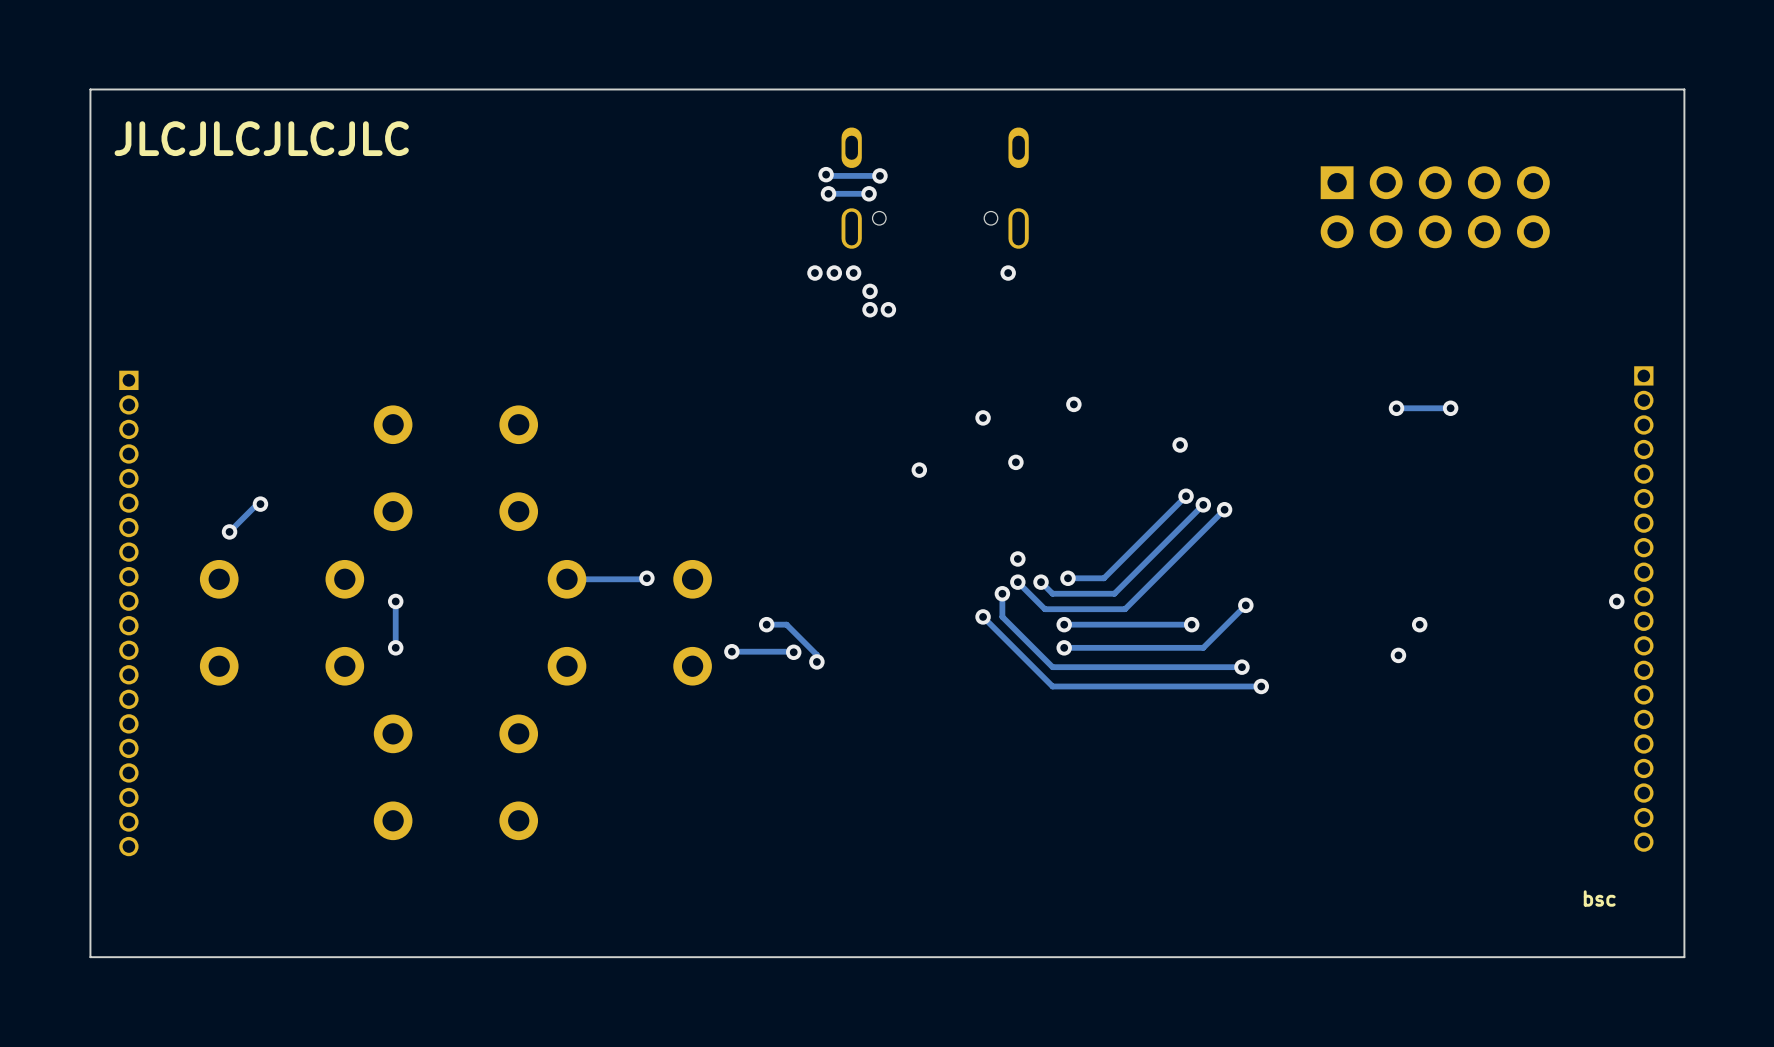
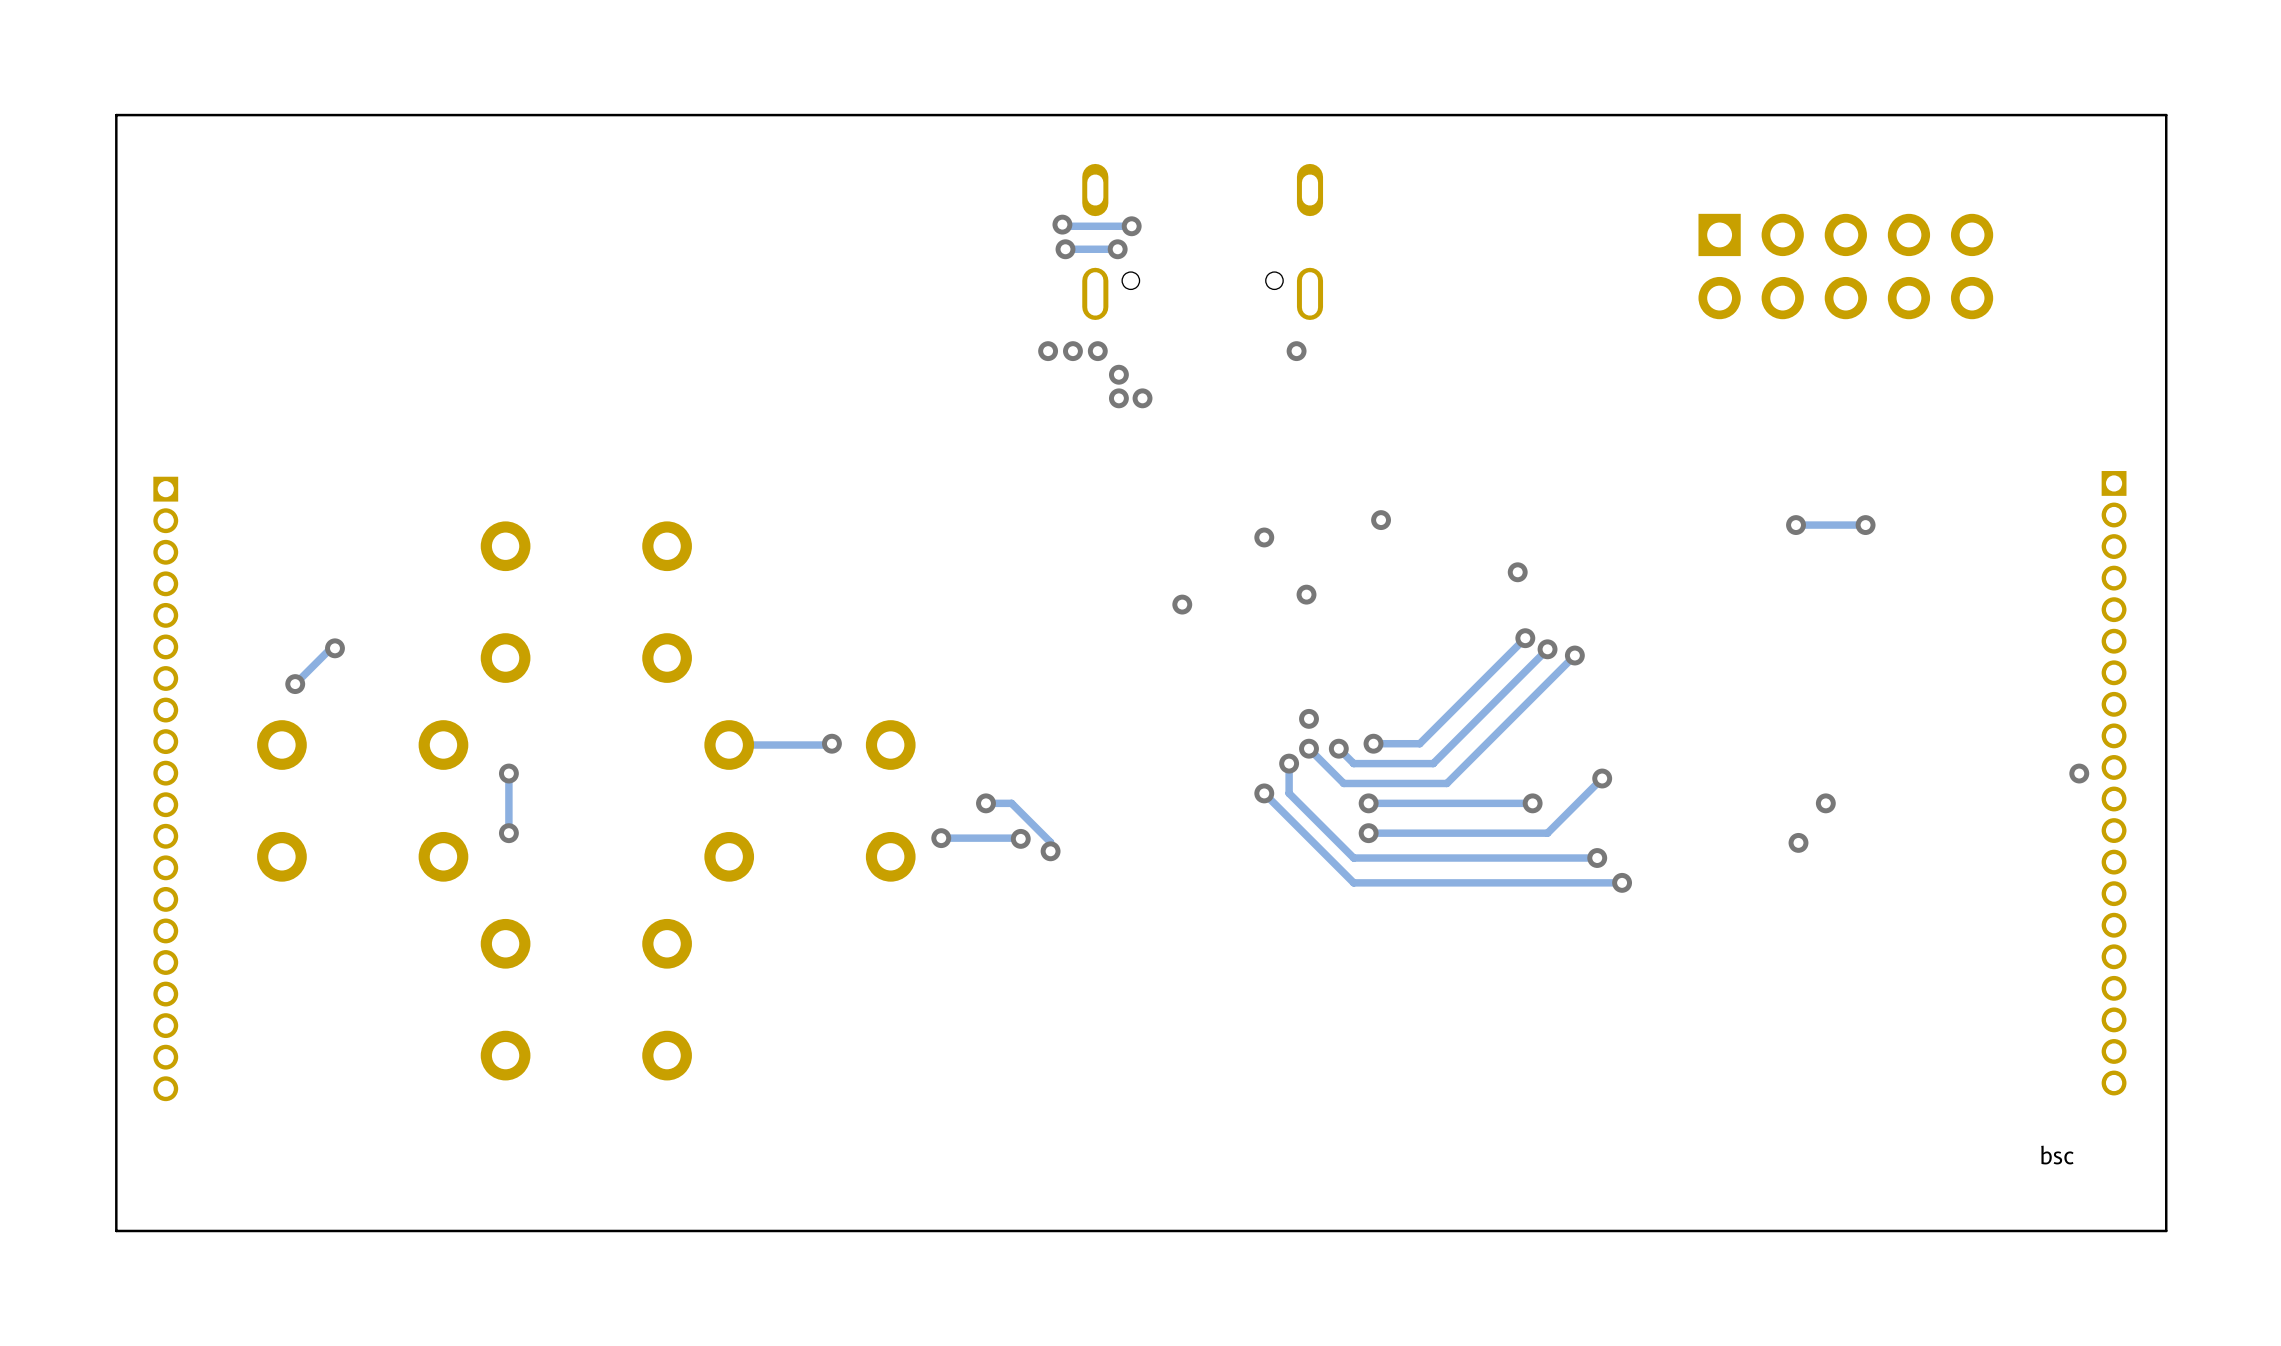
text: JLCJLCJLCJLC (261, 138) -> none

